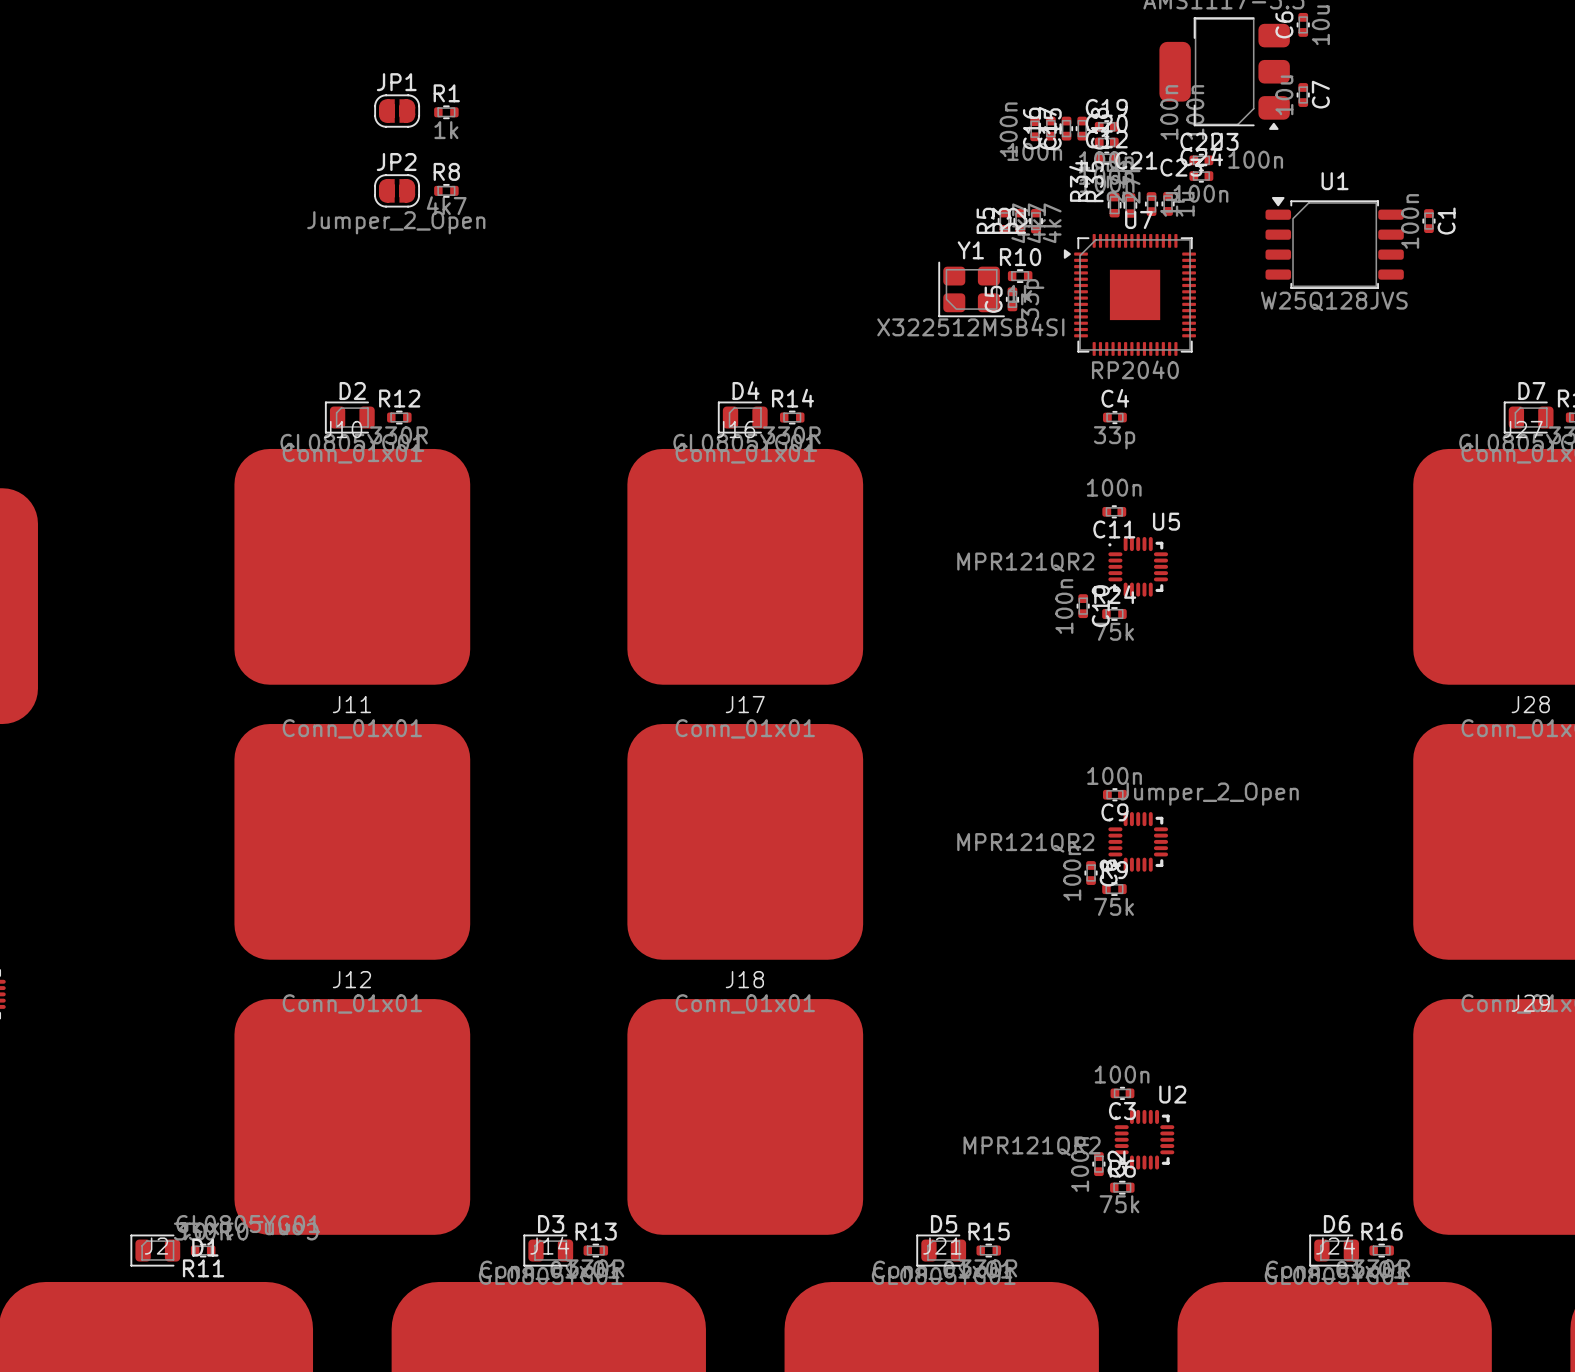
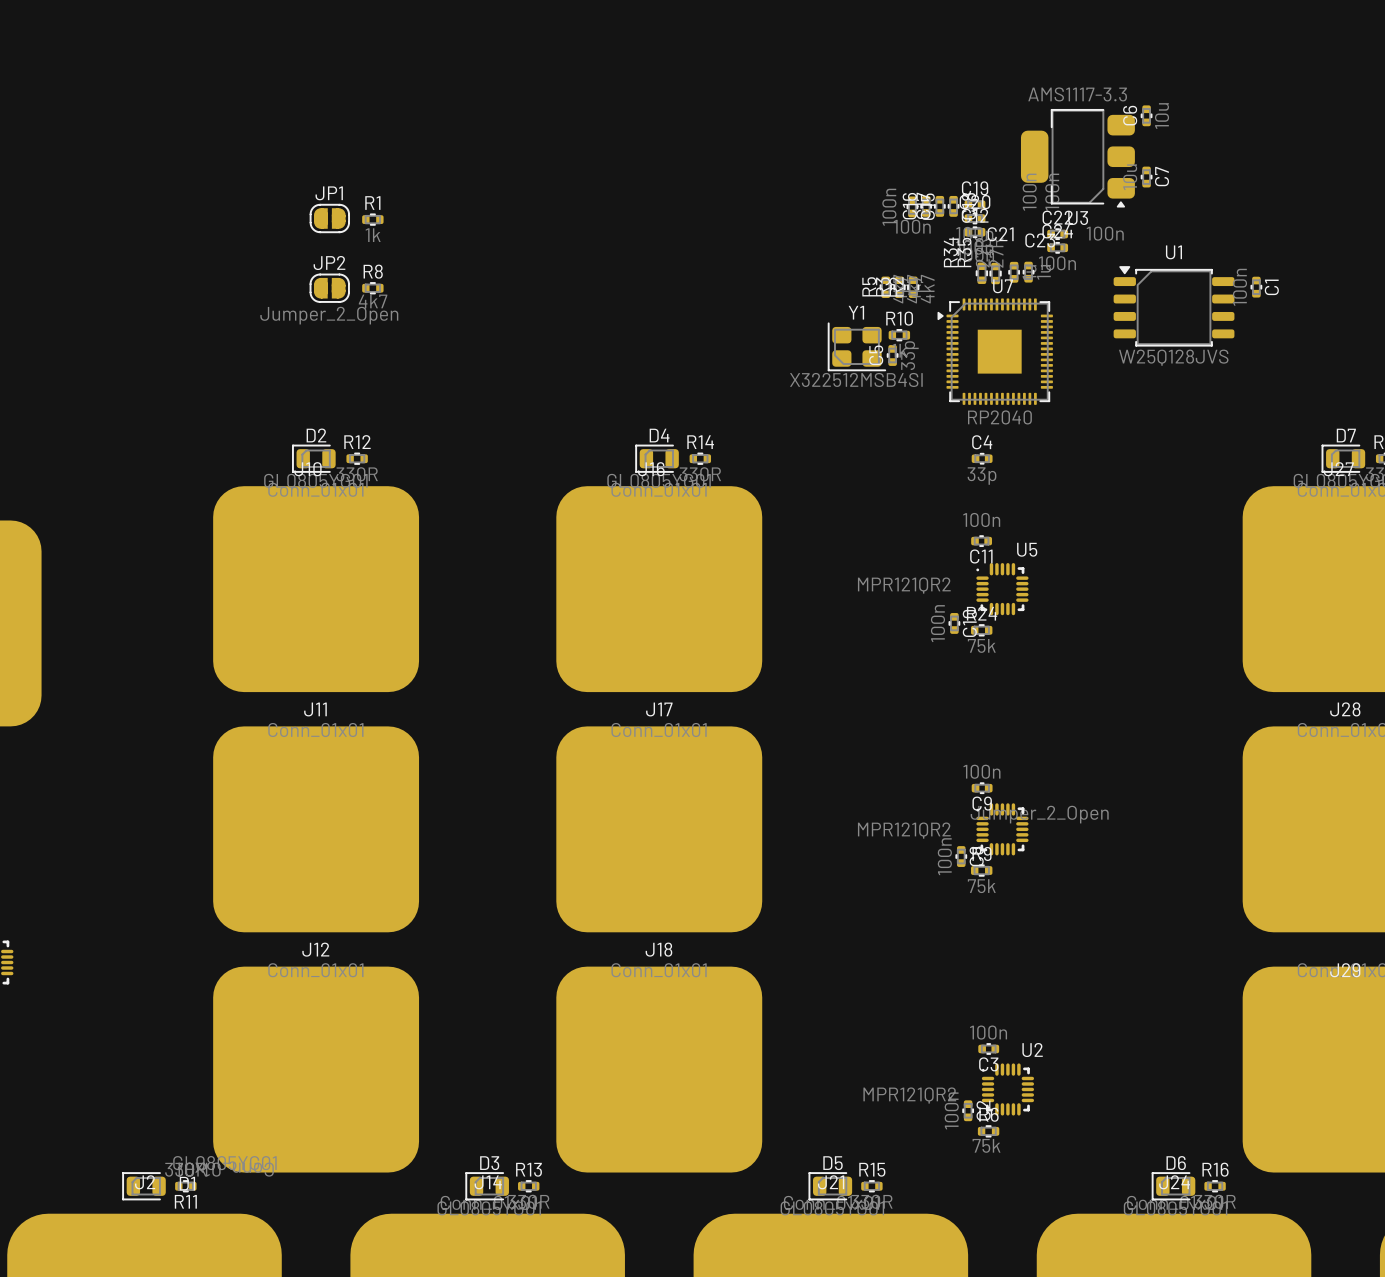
JP1 position: (397, 111) -> (329, 218)
R1 position: (446, 112) -> (372, 219)
JP2 position: (397, 190) -> (329, 288)
R8 position: (446, 190) -> (372, 288)

